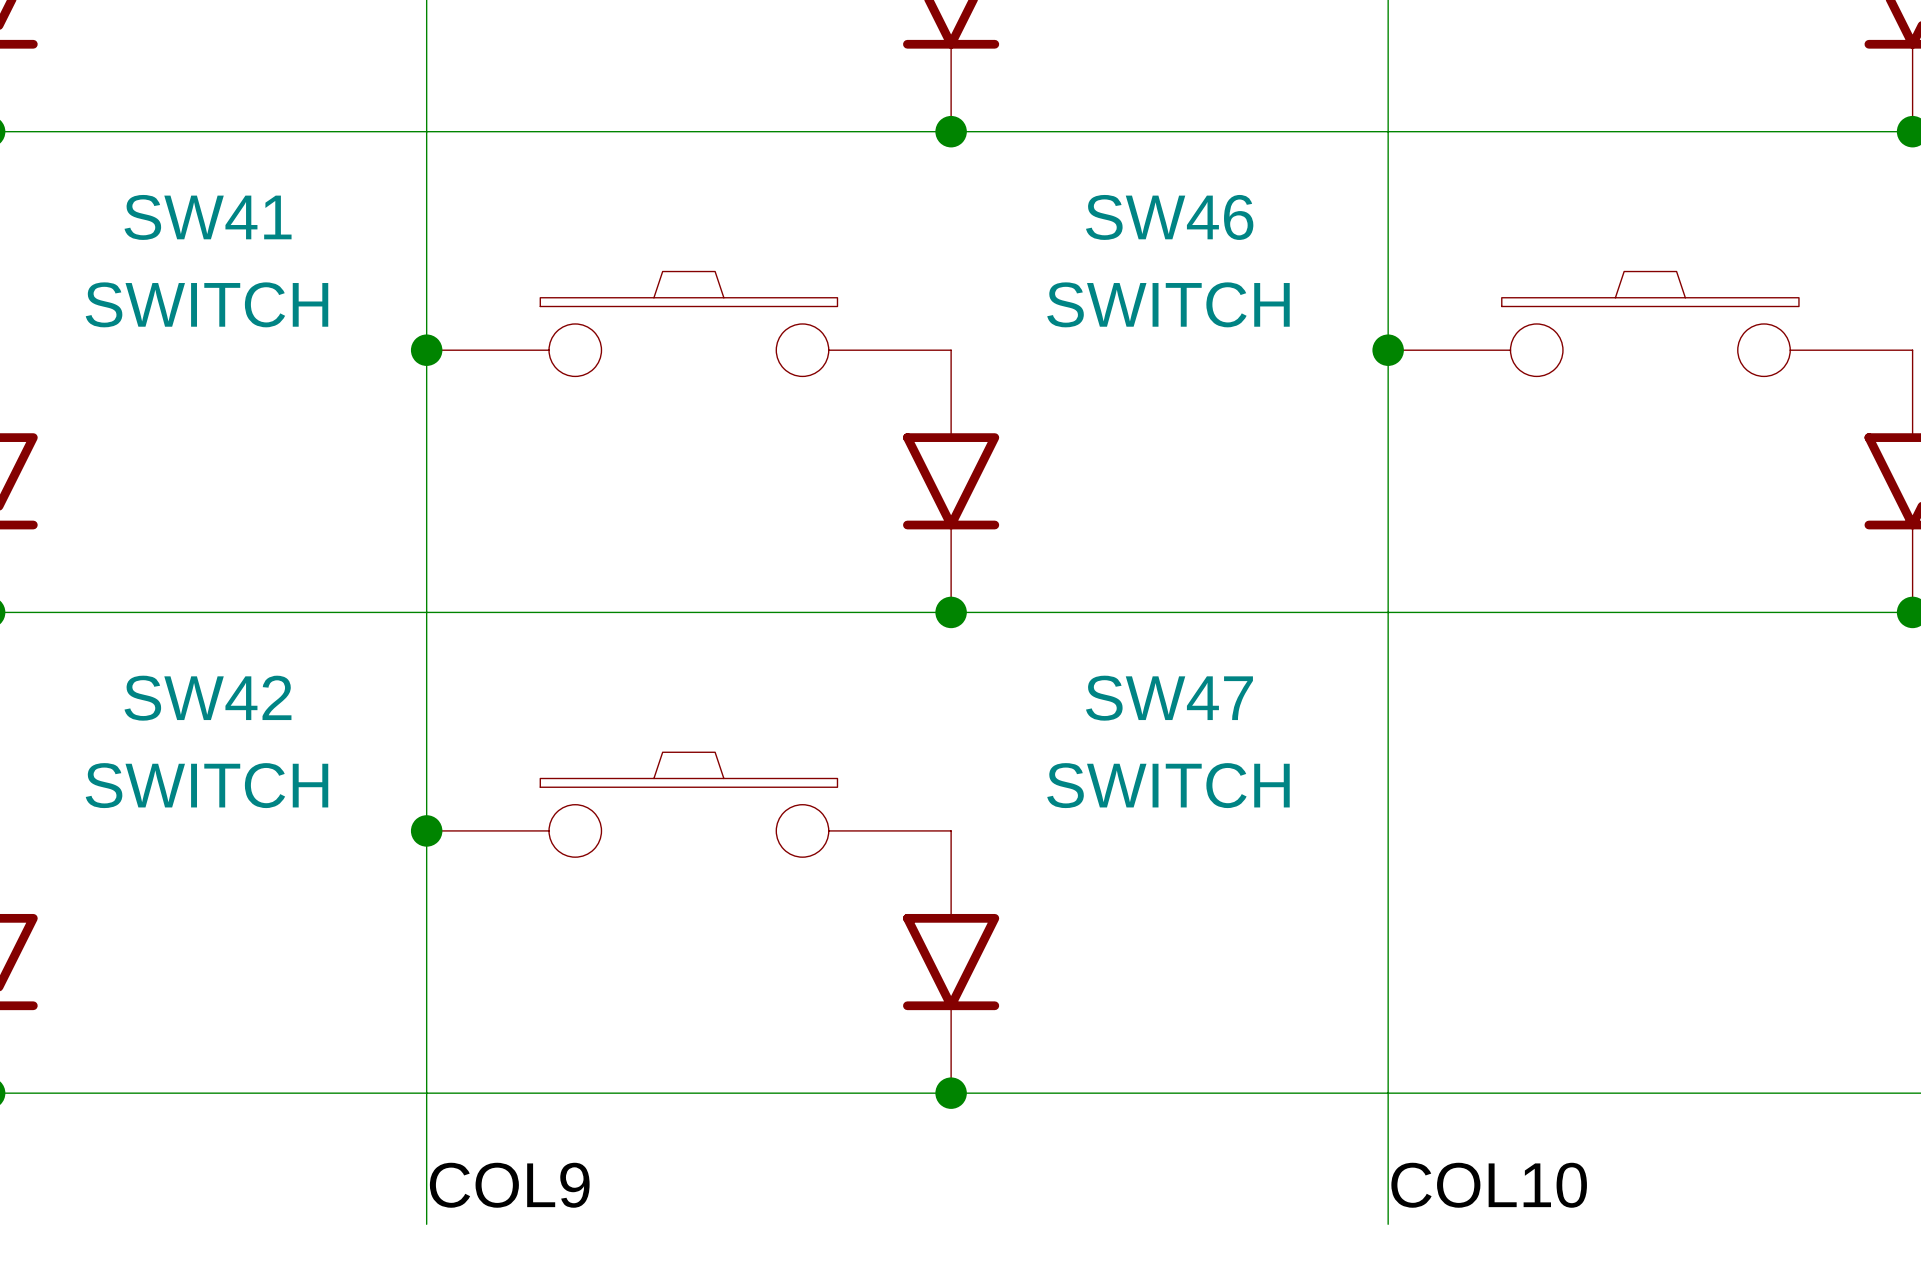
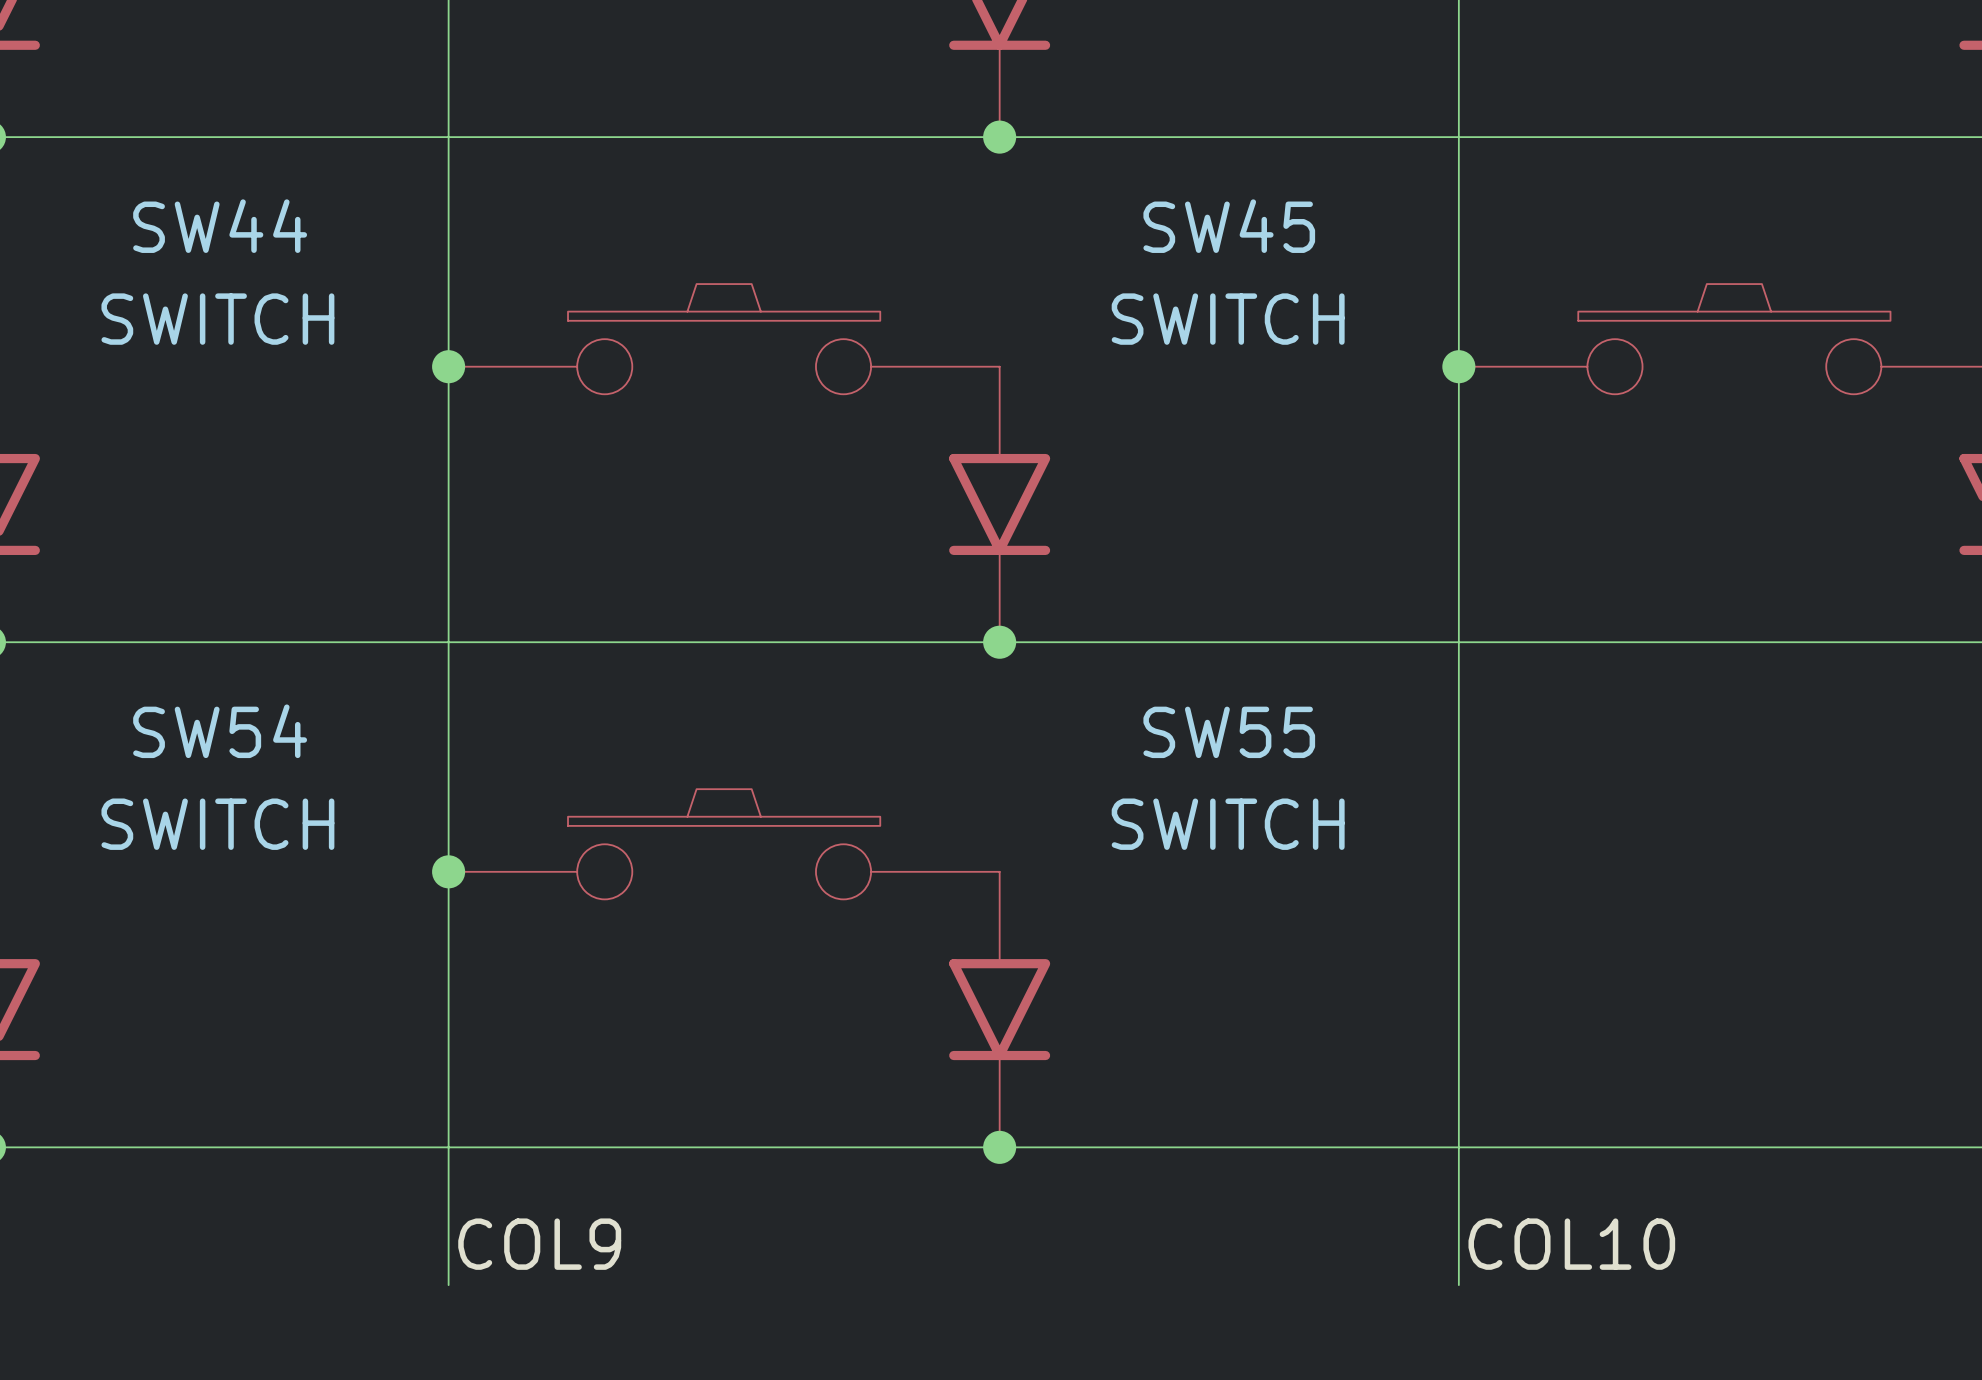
SW41 name: SW41 (208, 217) -> SW44 (220, 226)
SW46 name: SW46 (1169, 217) -> SW45 (1229, 226)
SW42 name: SW42 (208, 698) -> SW54 (220, 731)
SW47 name: SW47 (1169, 698) -> SW55 (1229, 732)

